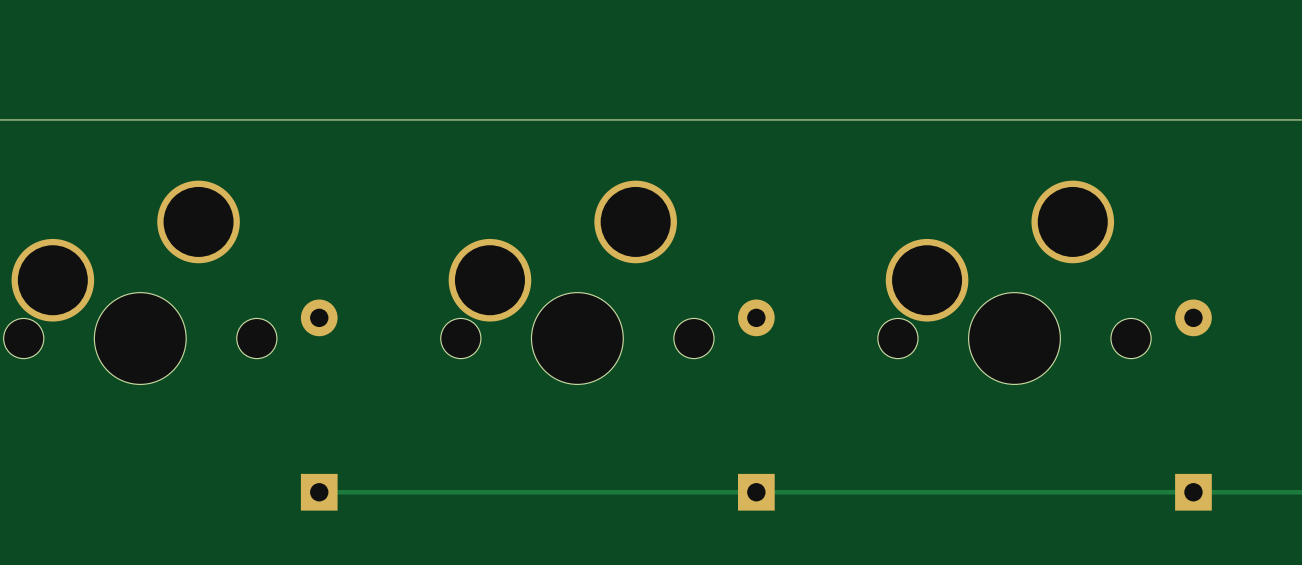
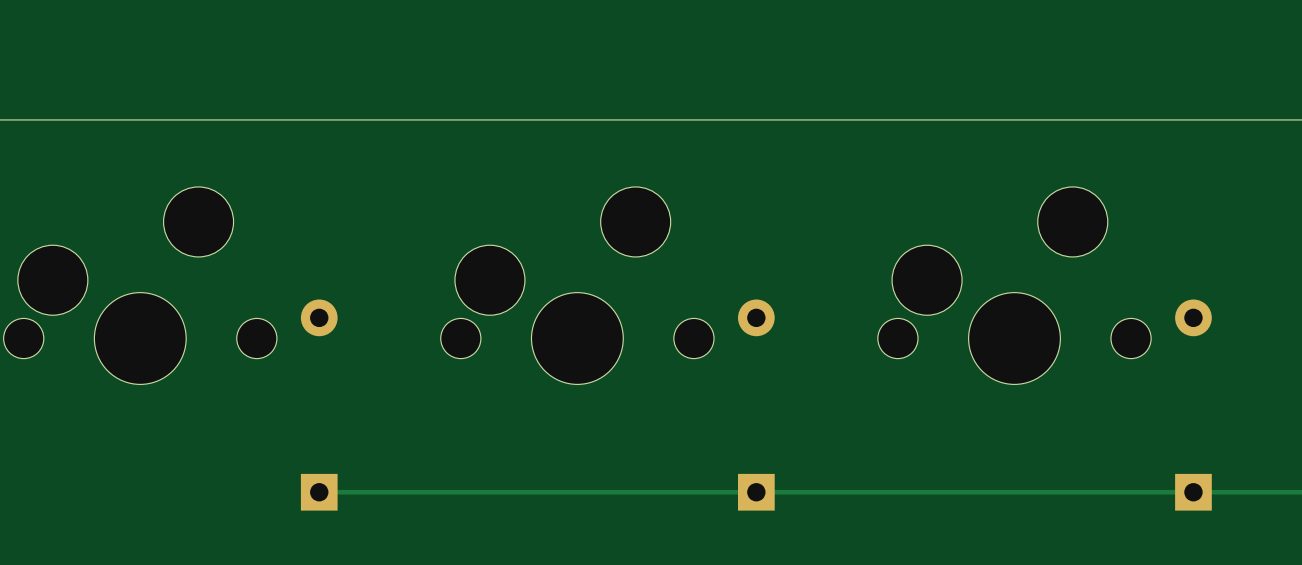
part footprint: [3, 180, 277, 385] -> [3, 186, 277, 385]
part footprint: [440, 180, 715, 385] -> [440, 186, 715, 385]
part footprint: [877, 180, 1152, 385] -> [877, 186, 1152, 385]

